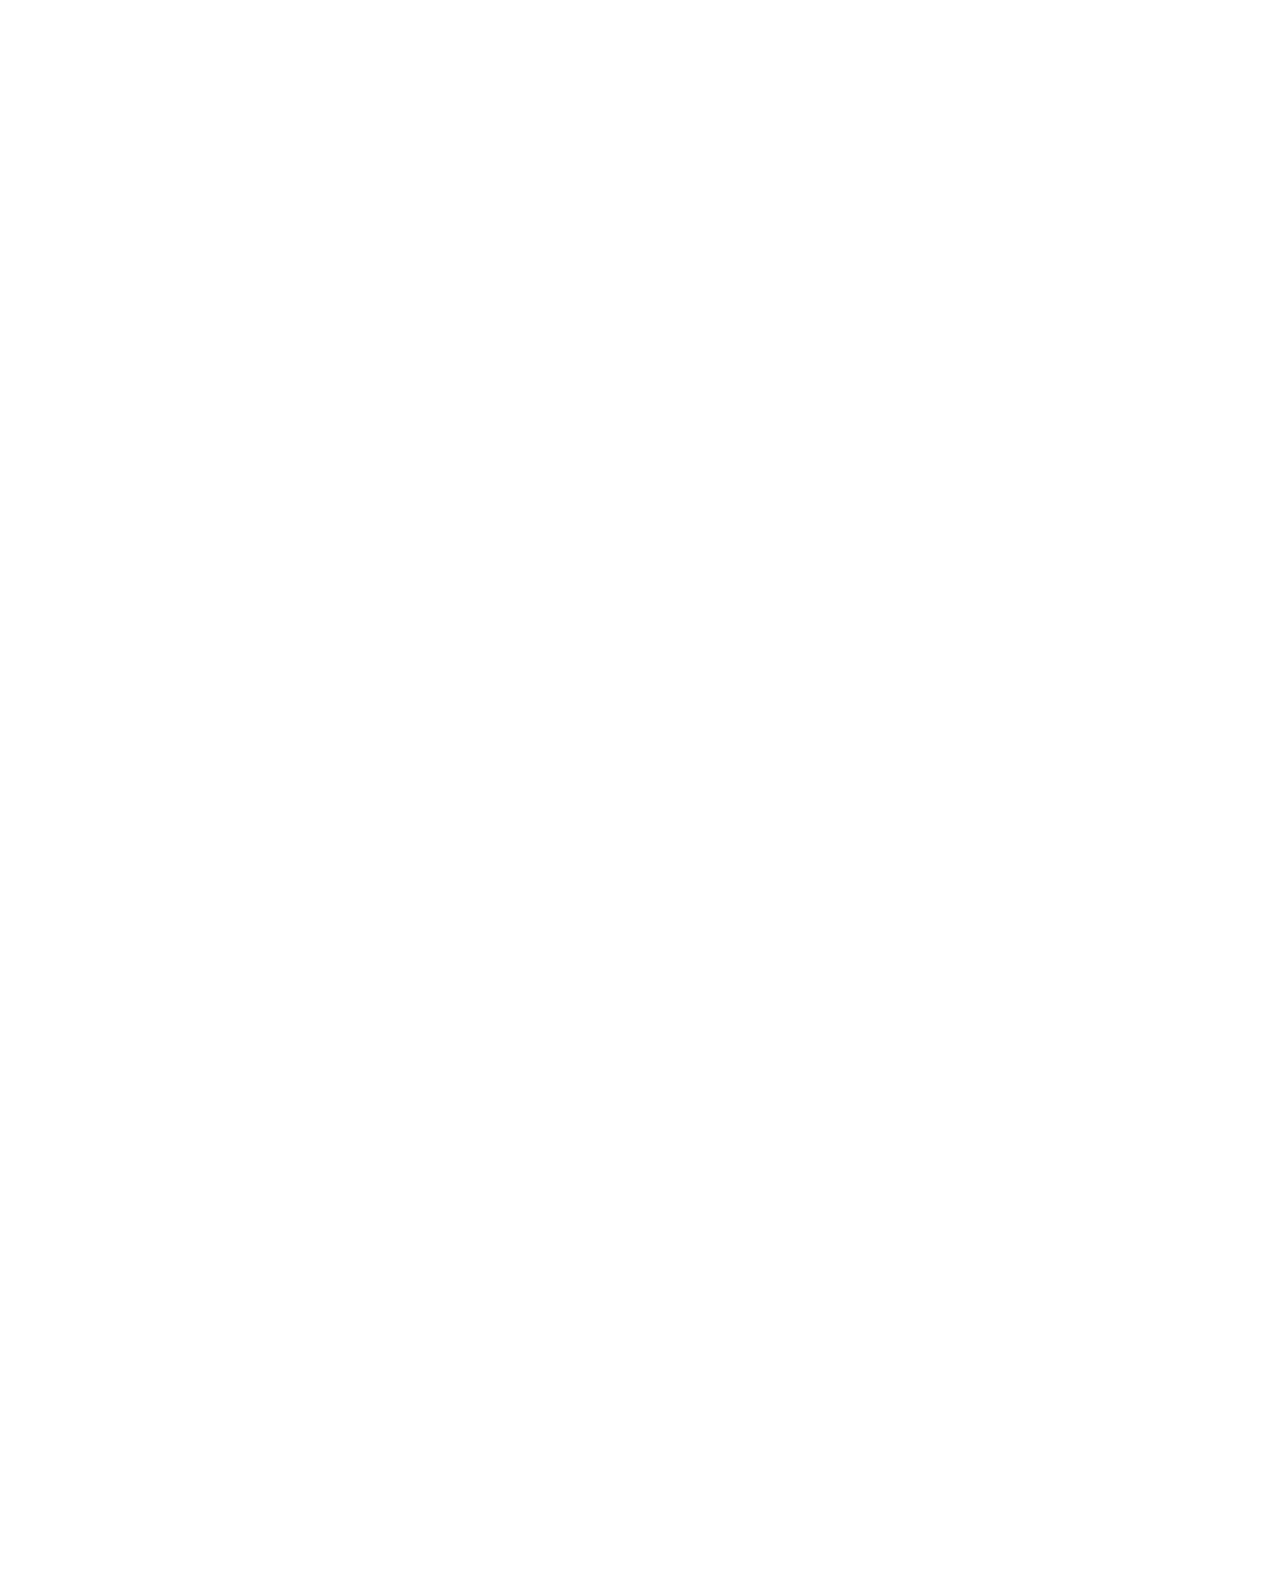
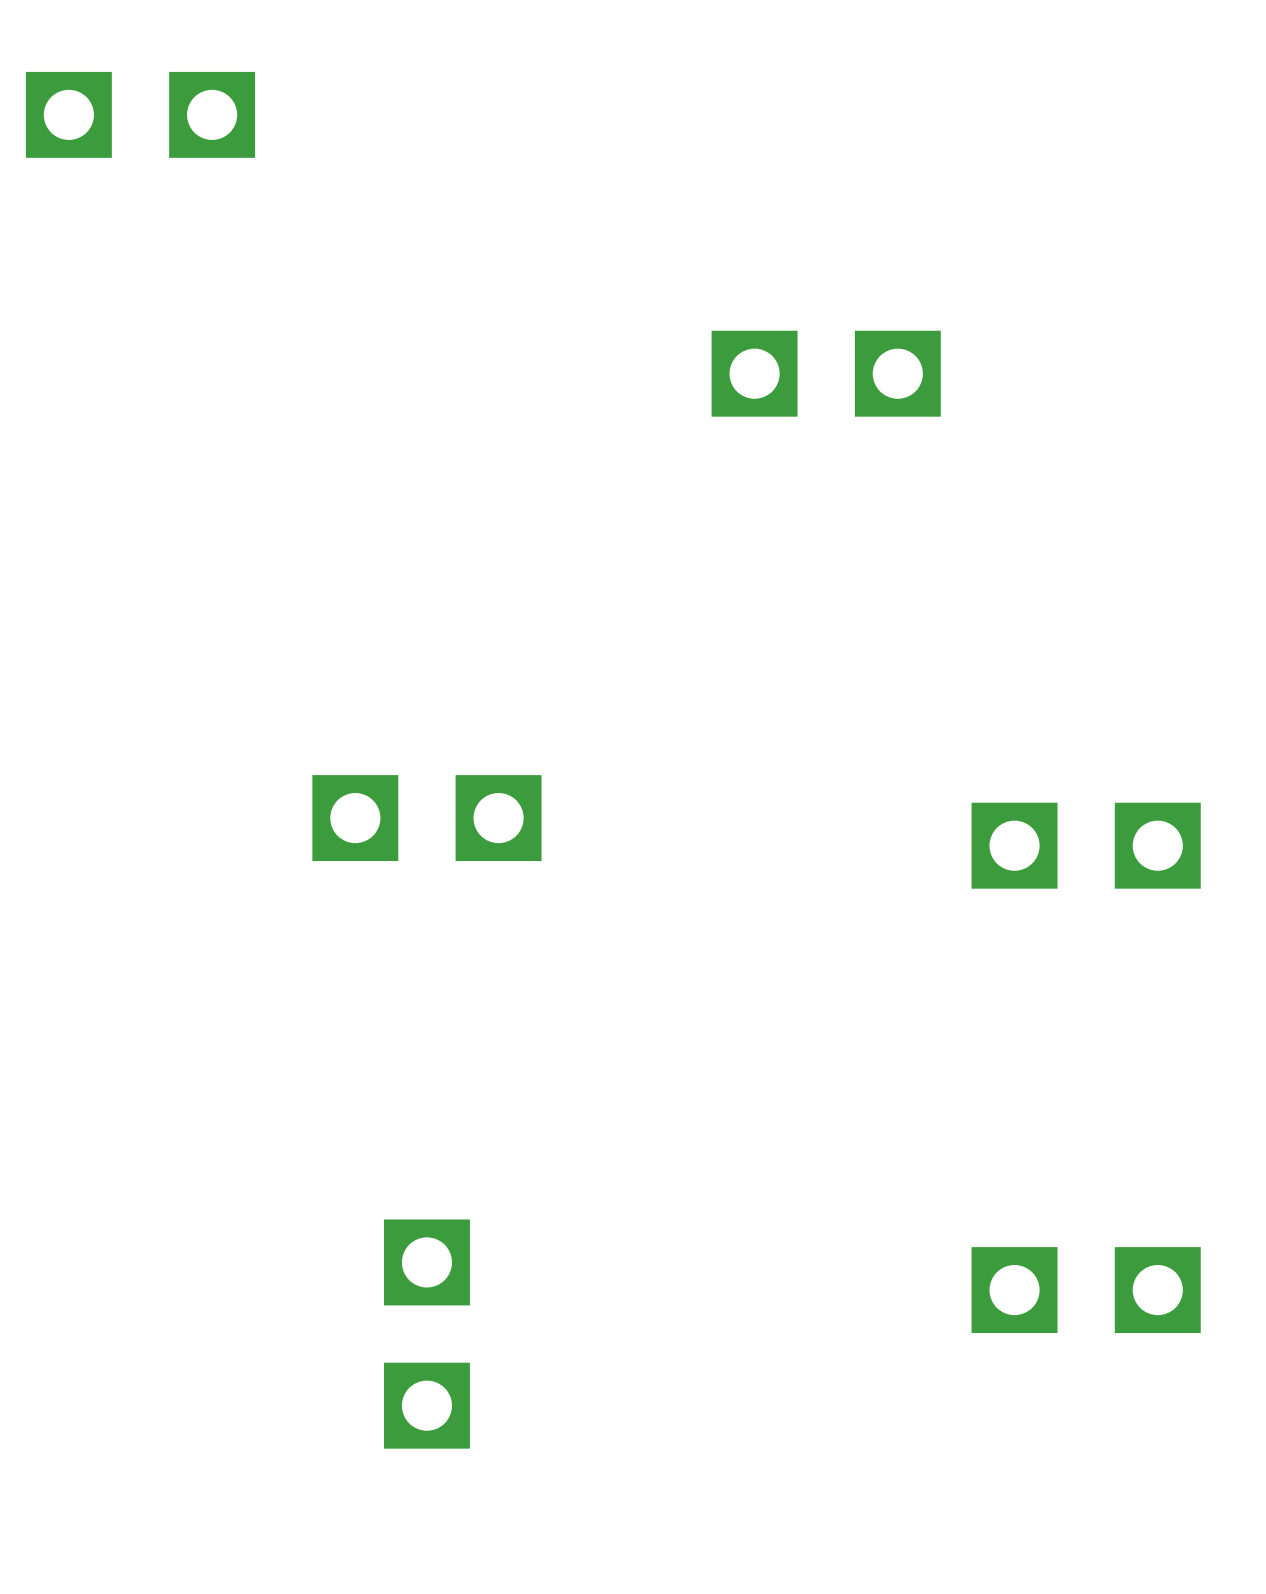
part: none -> (140, 114)
part: none -> (826, 373)
part: none -> (426, 818)
part: none -> (1086, 845)
part: none -> (1086, 1290)
part: none -> (426, 1334)

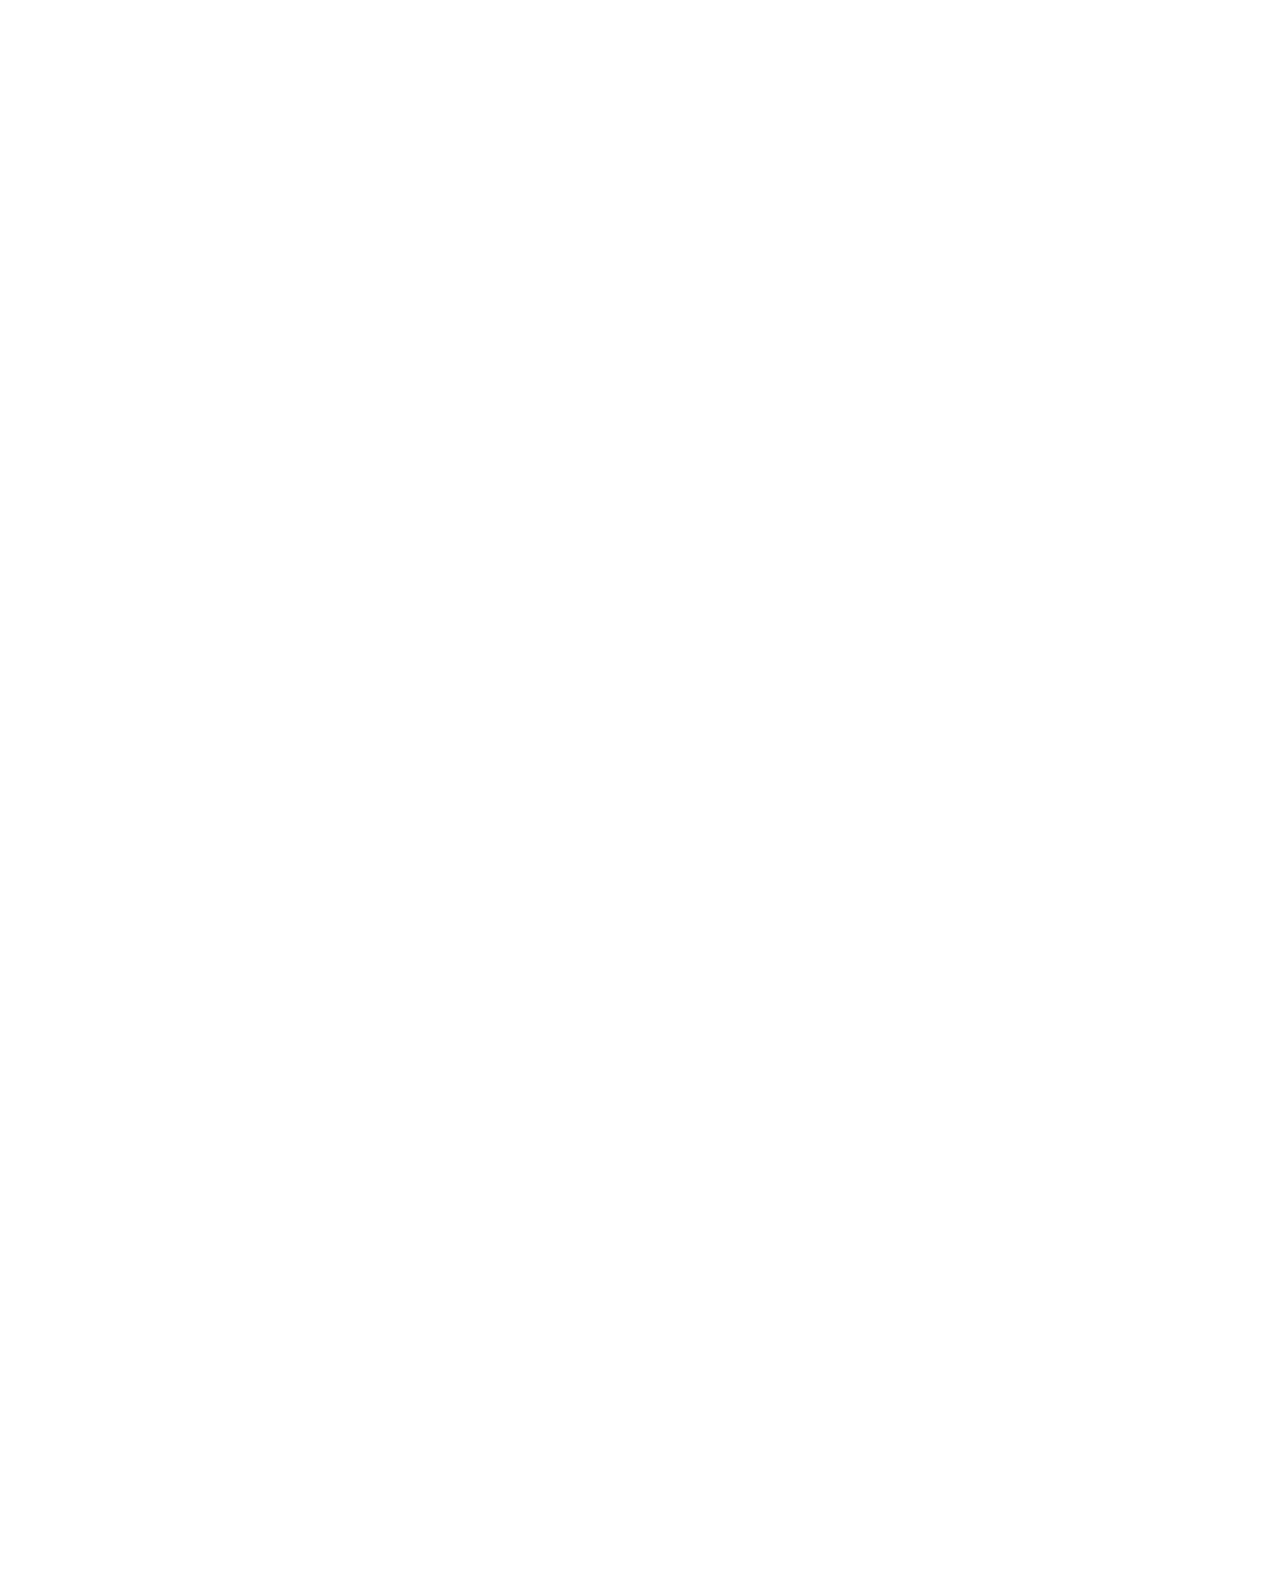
part: (140, 114) -> none
part: (826, 373) -> none
part: (426, 818) -> none
part: (1086, 845) -> none
part: (1086, 1290) -> none
part: (426, 1334) -> none

